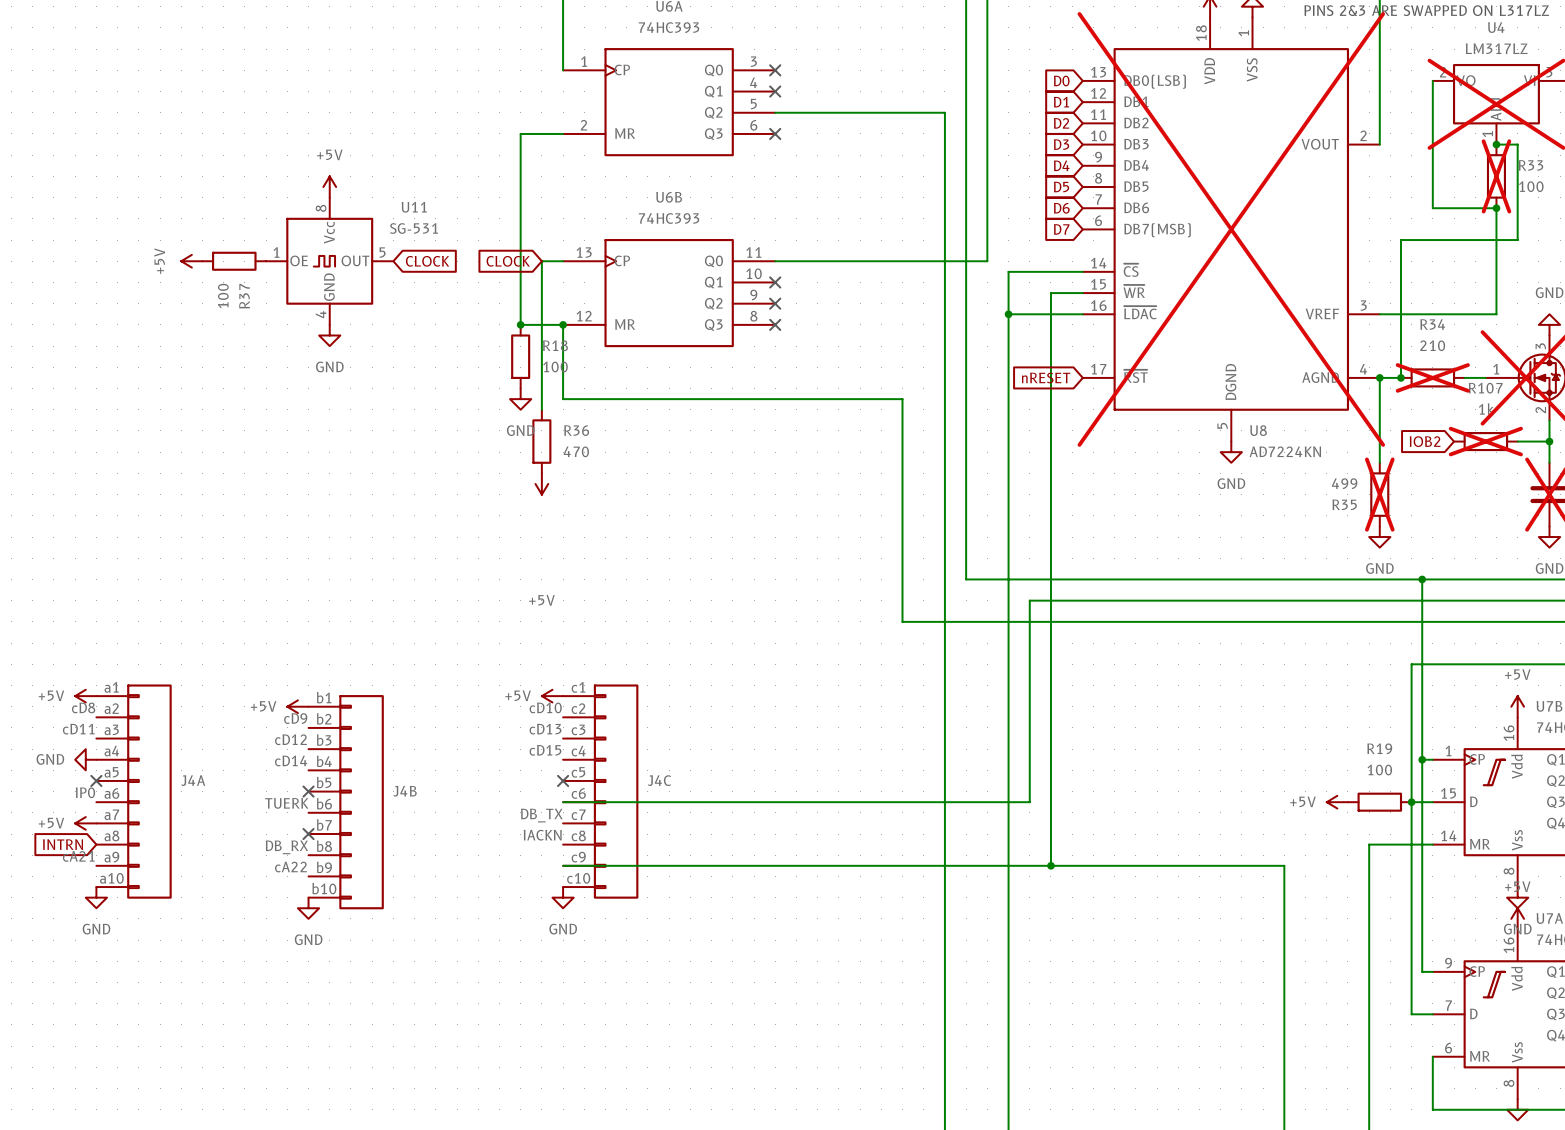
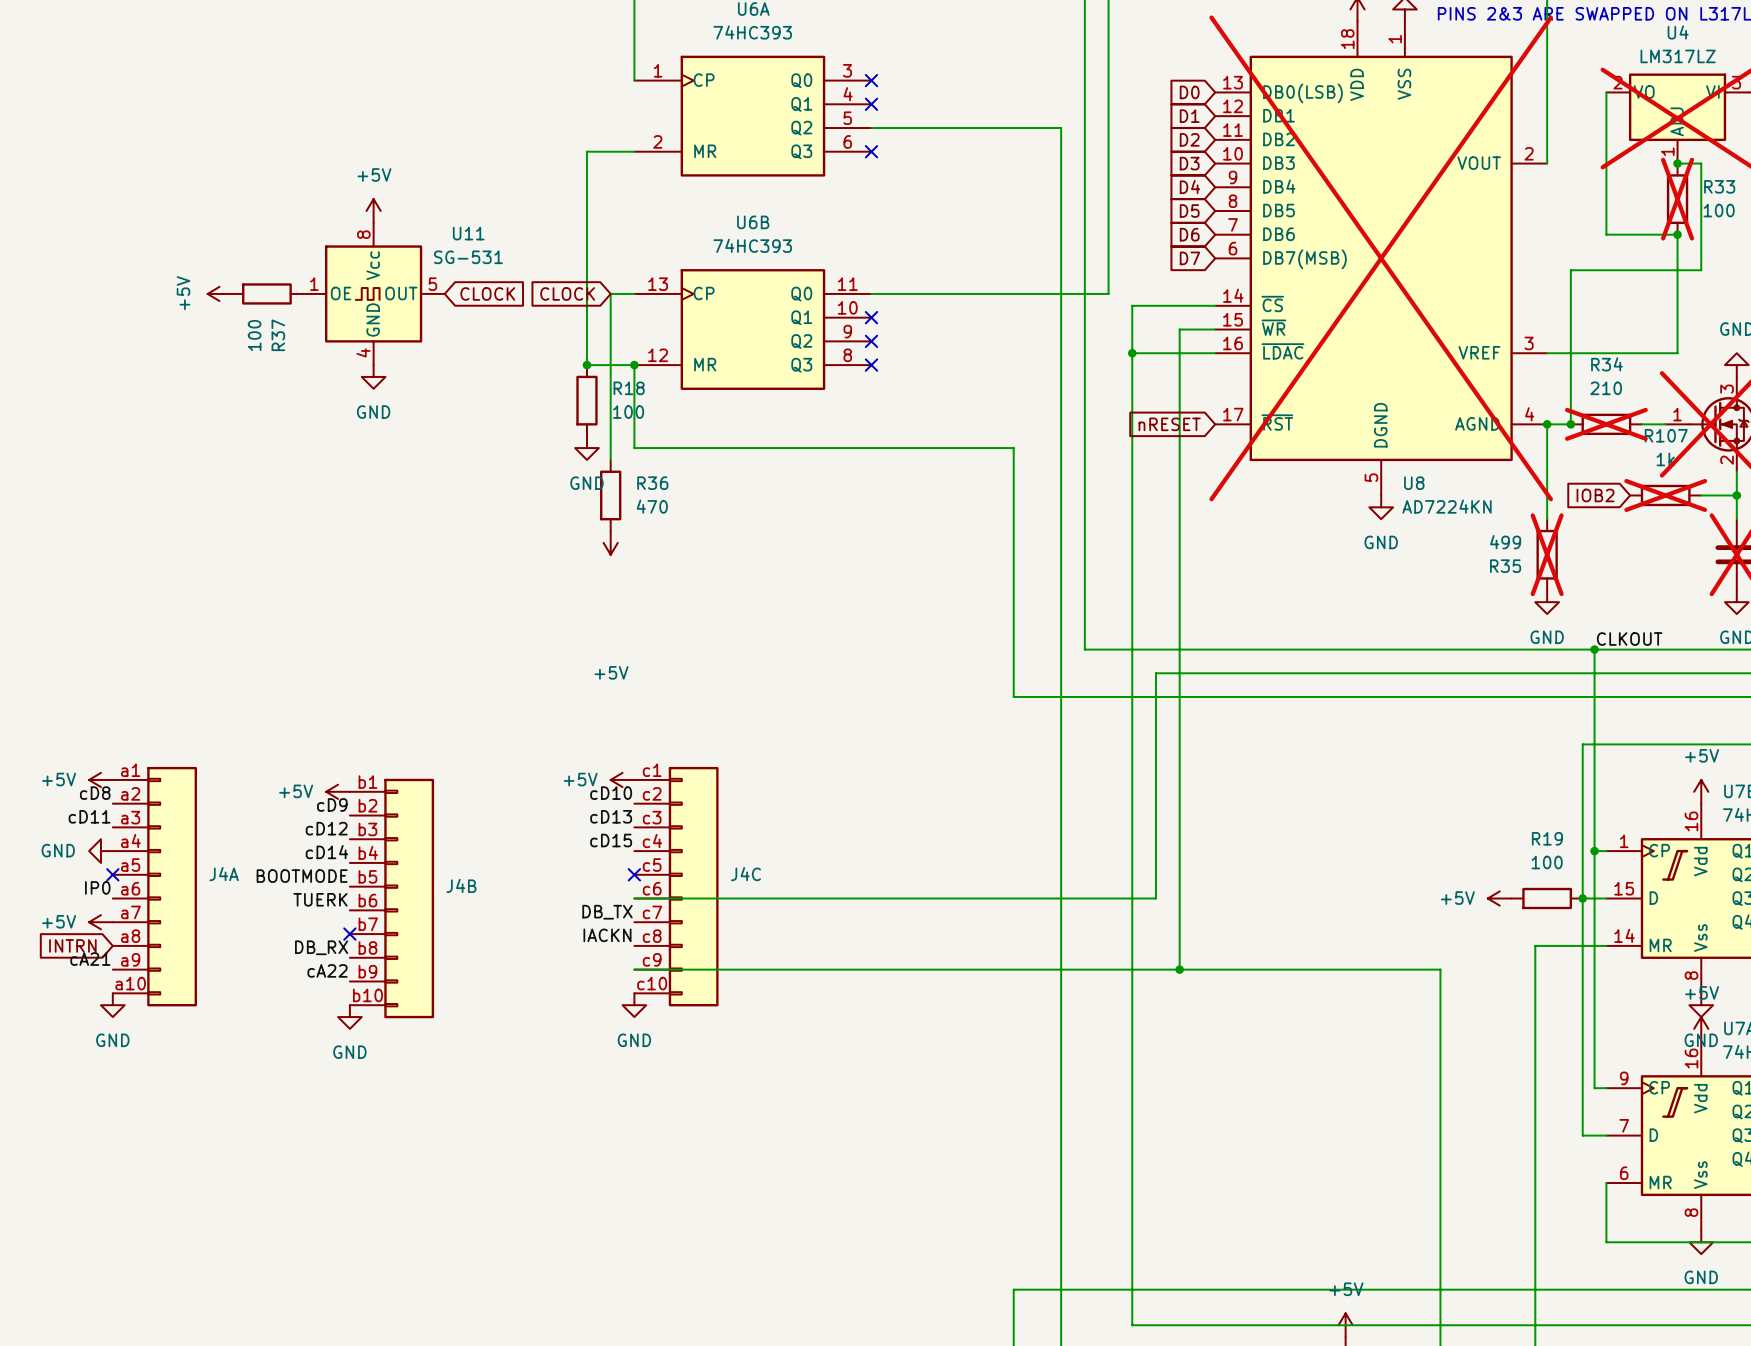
label: none -> CLKOUT (1629, 639)
label: none -> BOOTMODE (302, 876)
no-connect mark: (308, 791) -> none

